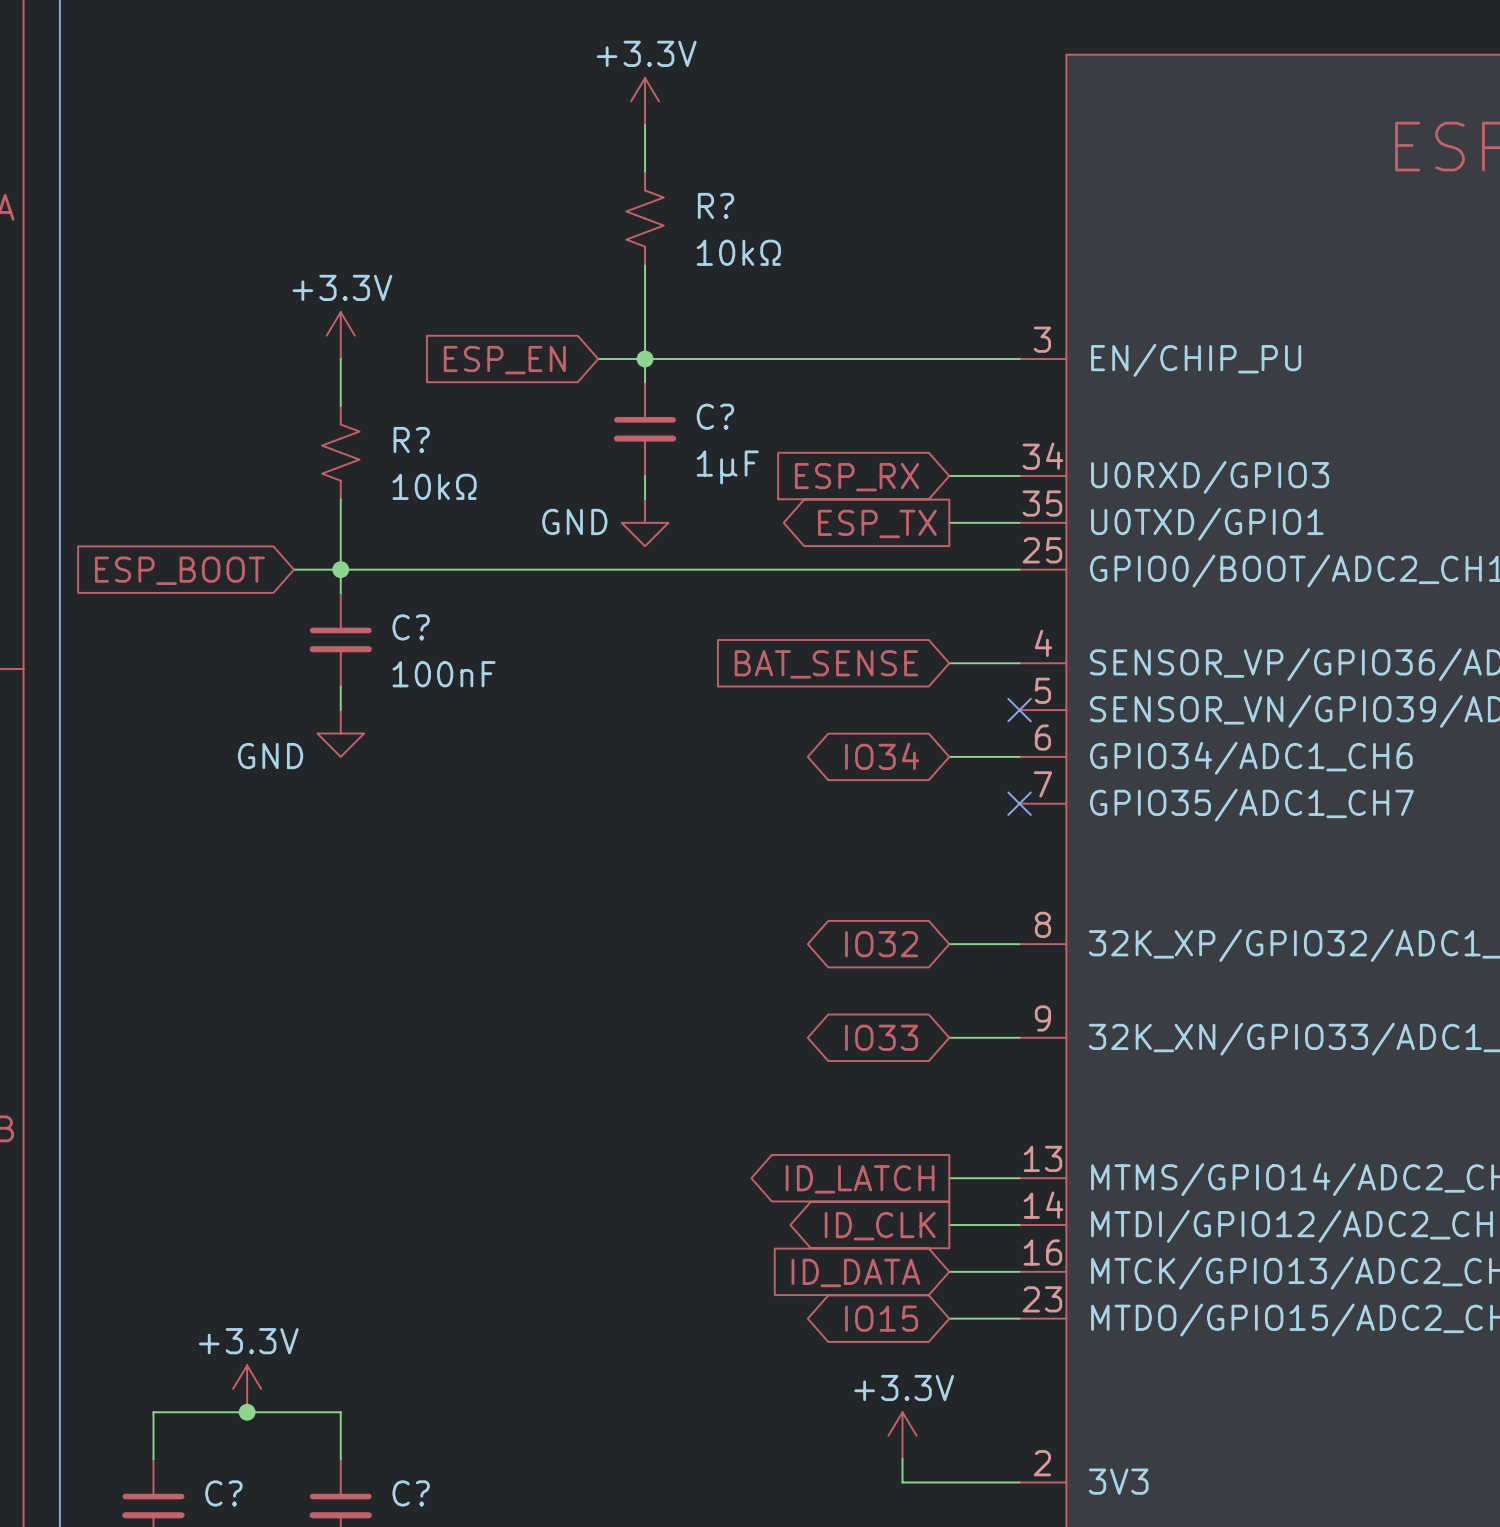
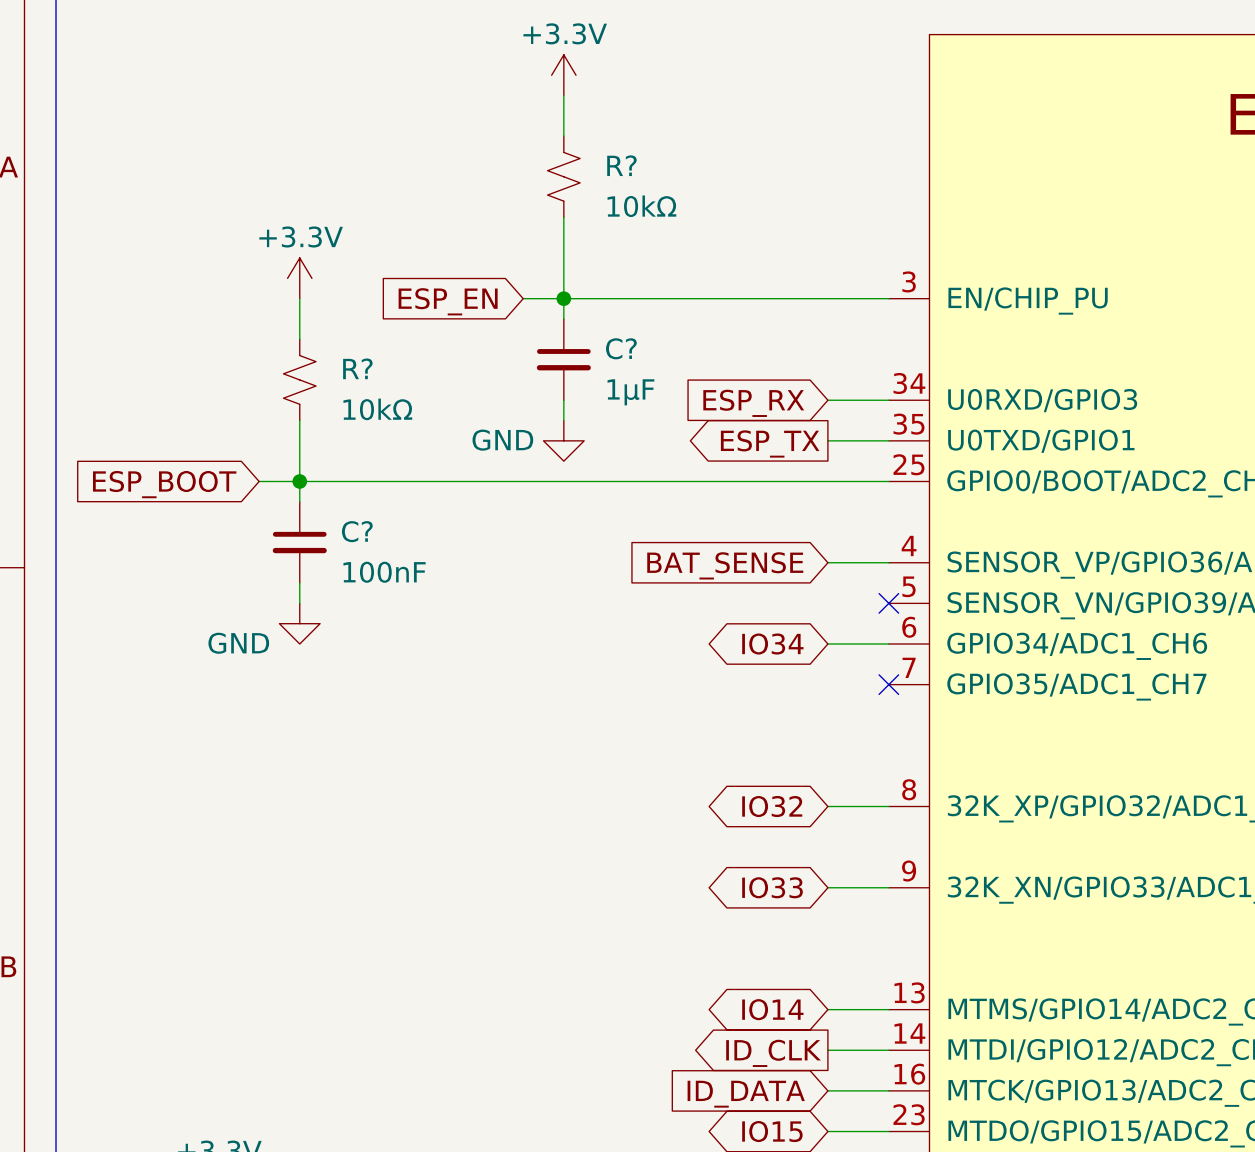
global label shape: output (860, 1179) -> bidirectional (772, 1009)
global label: ID_LATCH (860, 1179) -> IO14 (772, 1009)

